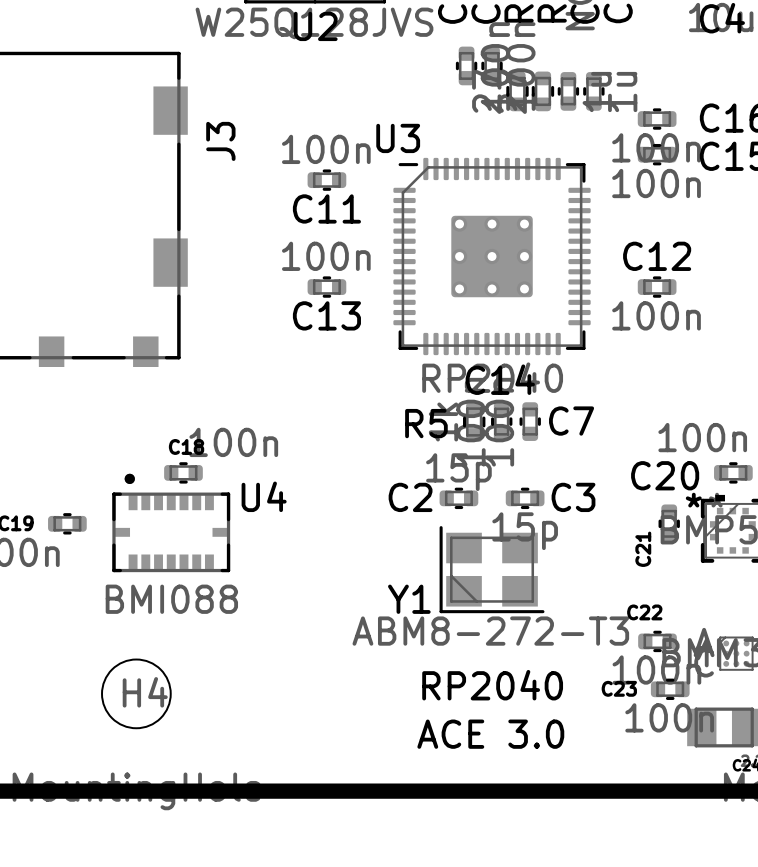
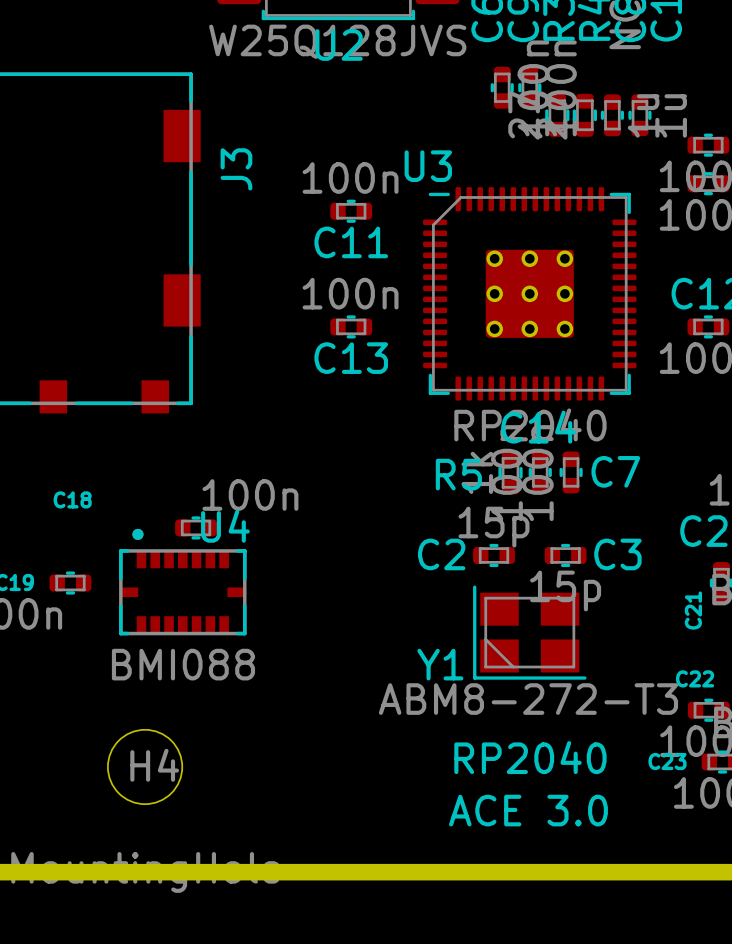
C18 name position: C18 (186, 446) -> C18 (72, 499)
U4 name position: U4 (264, 496) -> U4 (225, 526)

